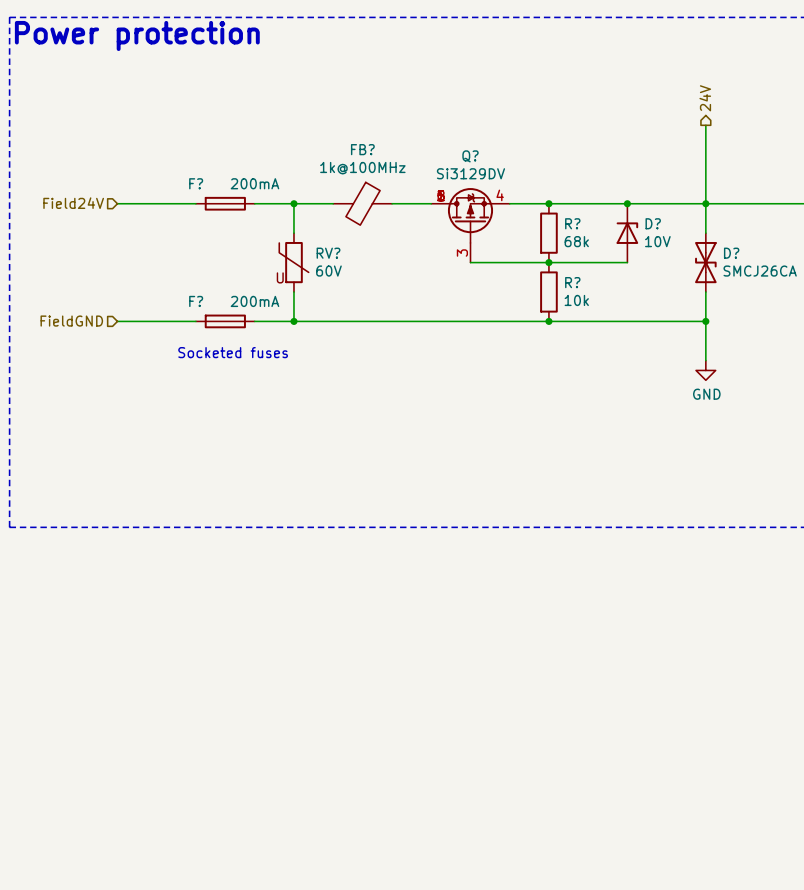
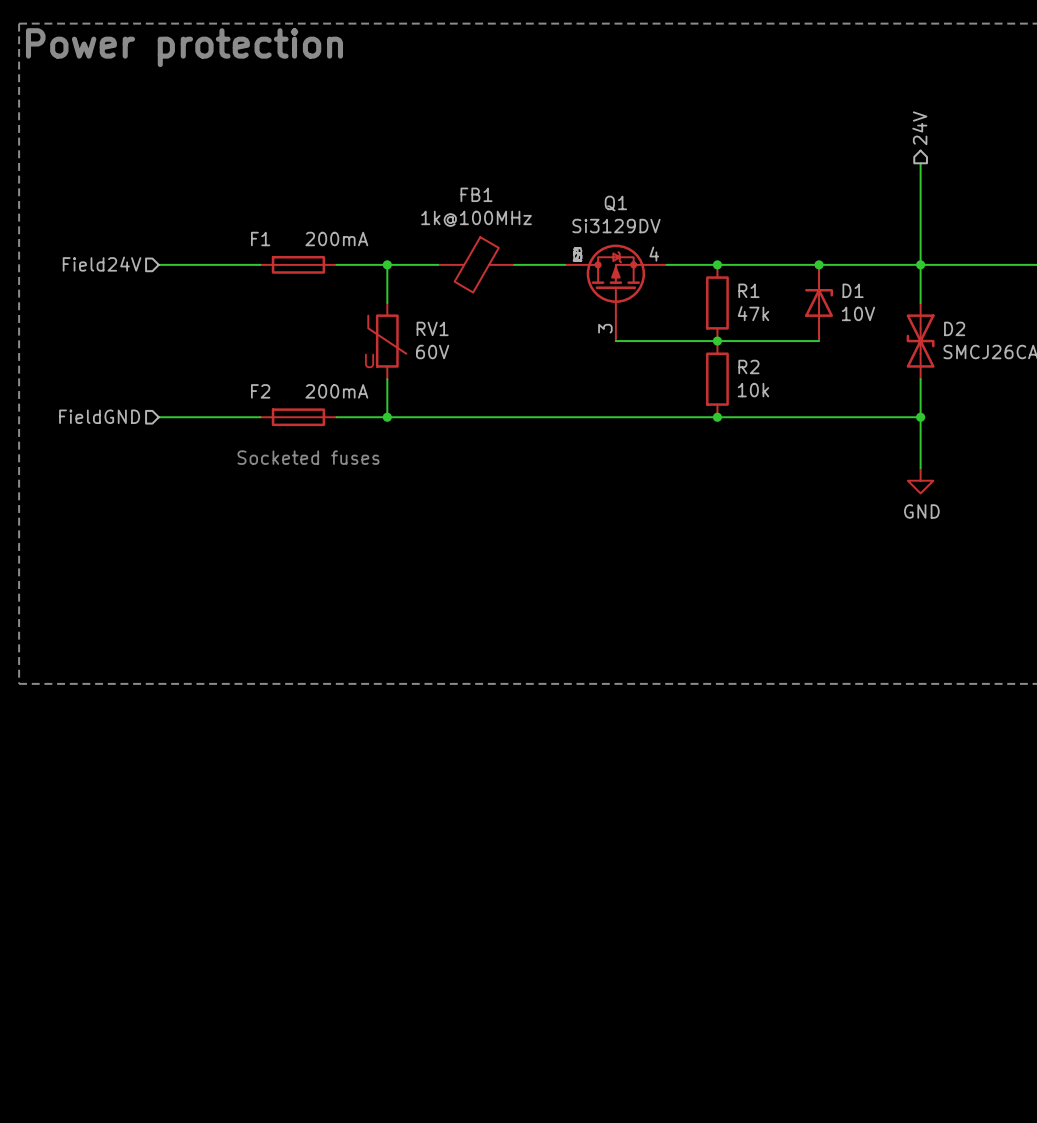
FB? name: FB? (362, 149) -> FB1 (476, 194)
Q? name: Q? (470, 156) -> Q1 (615, 203)
F? name: F? (196, 183) -> F1 (260, 239)
R? name: R? (572, 223) -> R1 (748, 290)
D? name: D? (653, 223) -> D1 (853, 290)
R? value: 68k (576, 241) -> 47k (753, 313)
RV? name: RV? (328, 253) -> RV1 (432, 328)
D? name: D? (731, 253) -> D2 (954, 328)
R? name: R? (572, 282) -> R2 (748, 366)
F? name: F? (196, 301) -> F2 (260, 391)

